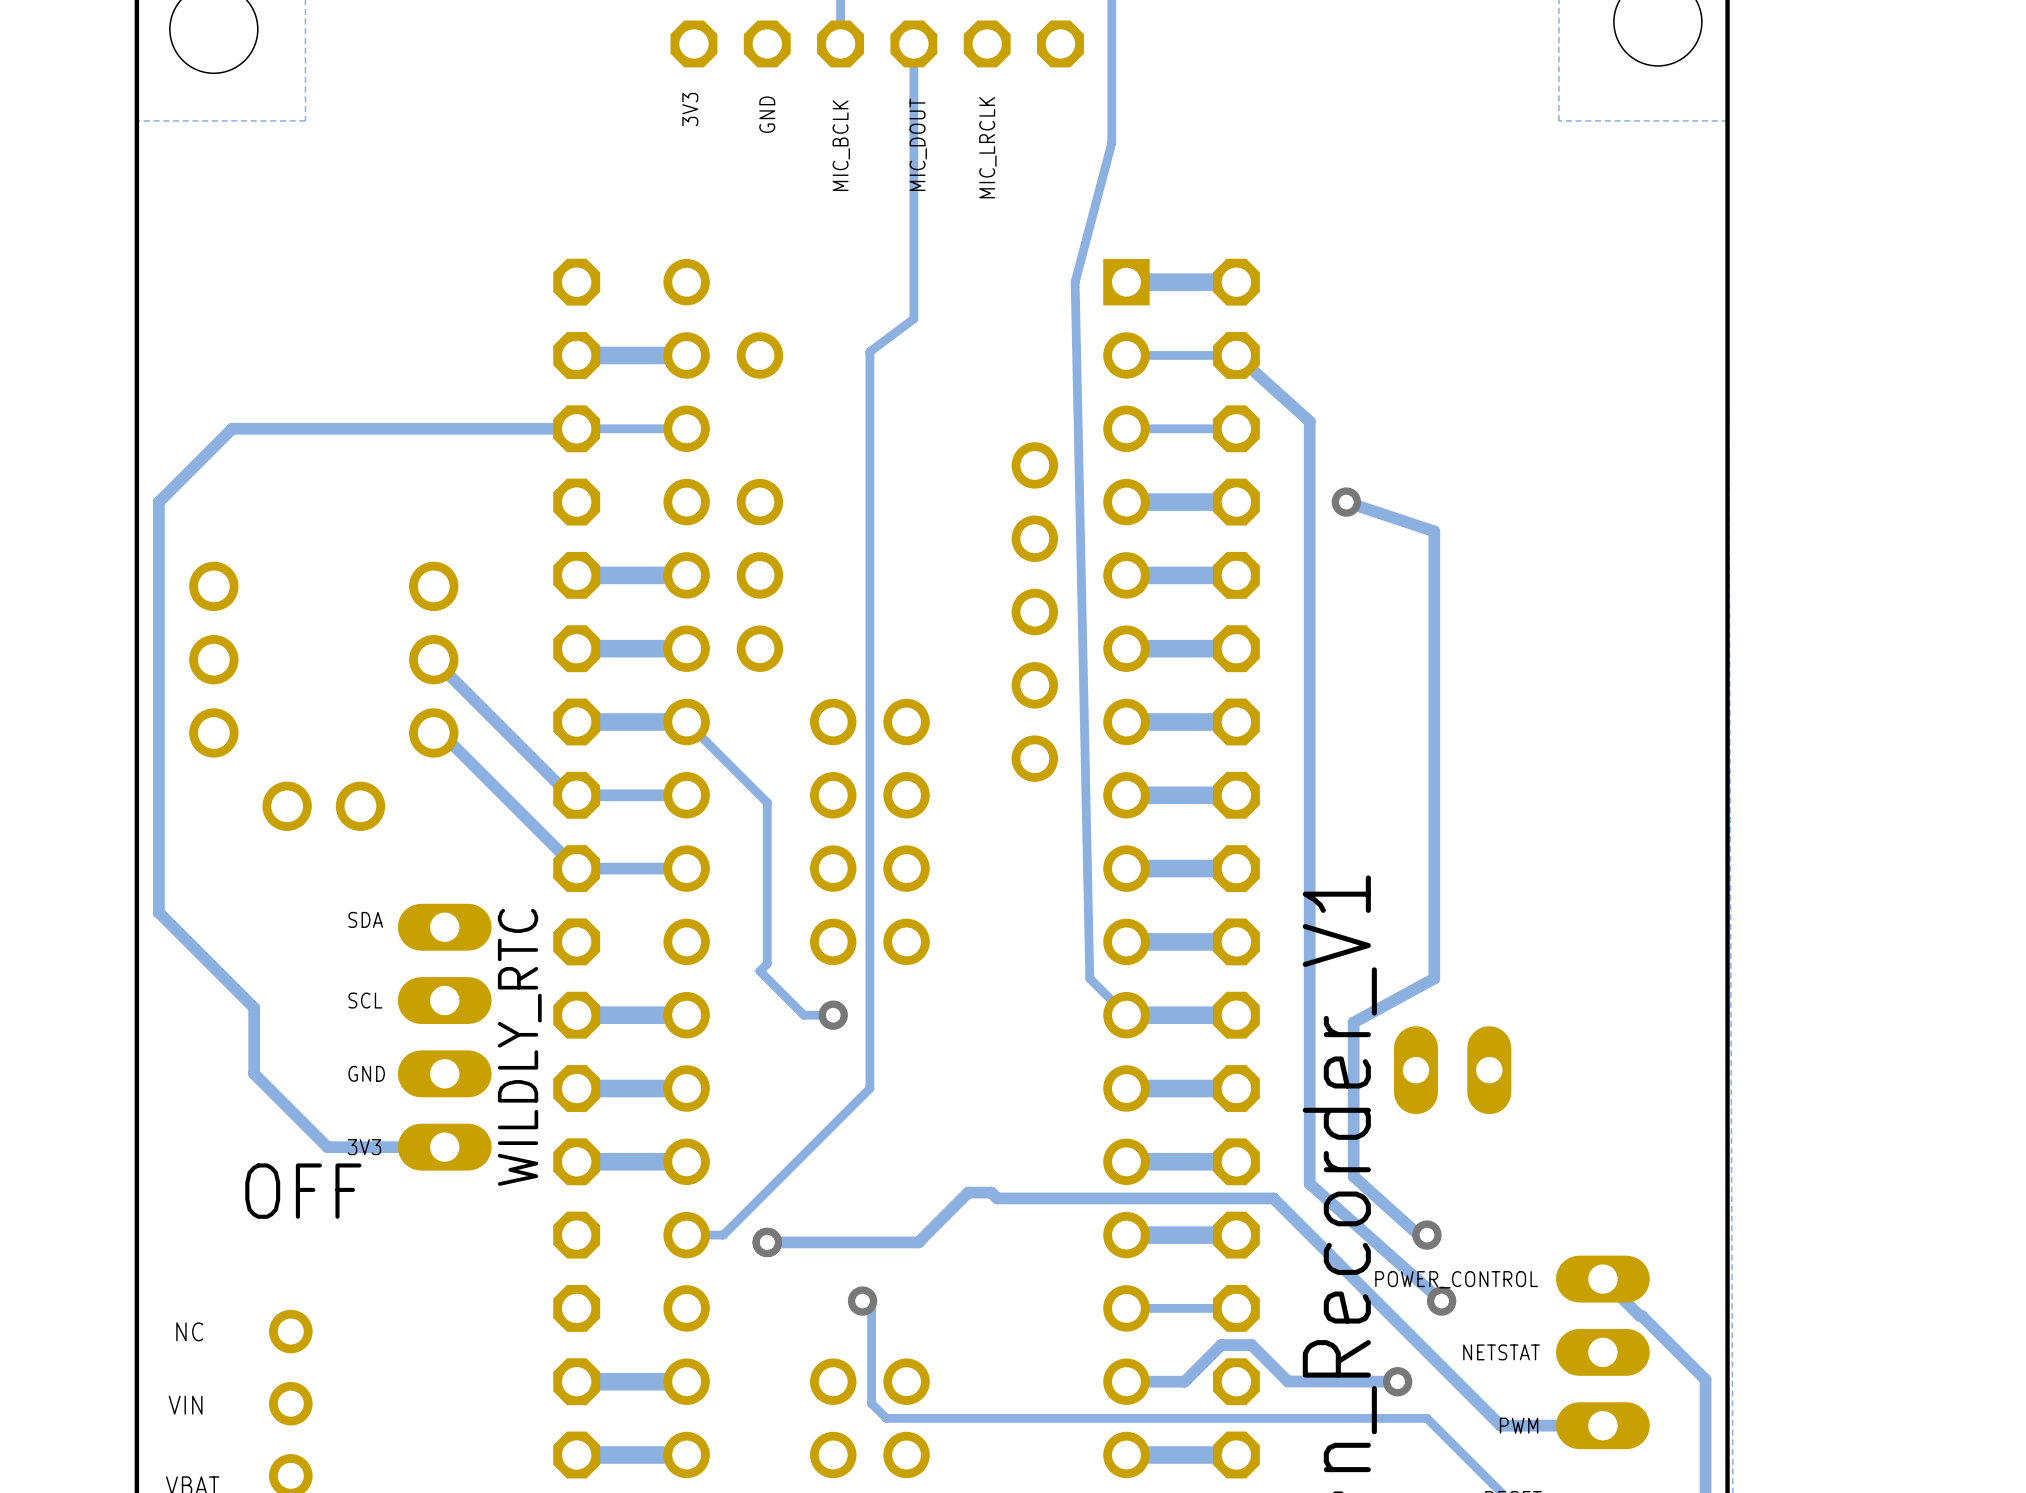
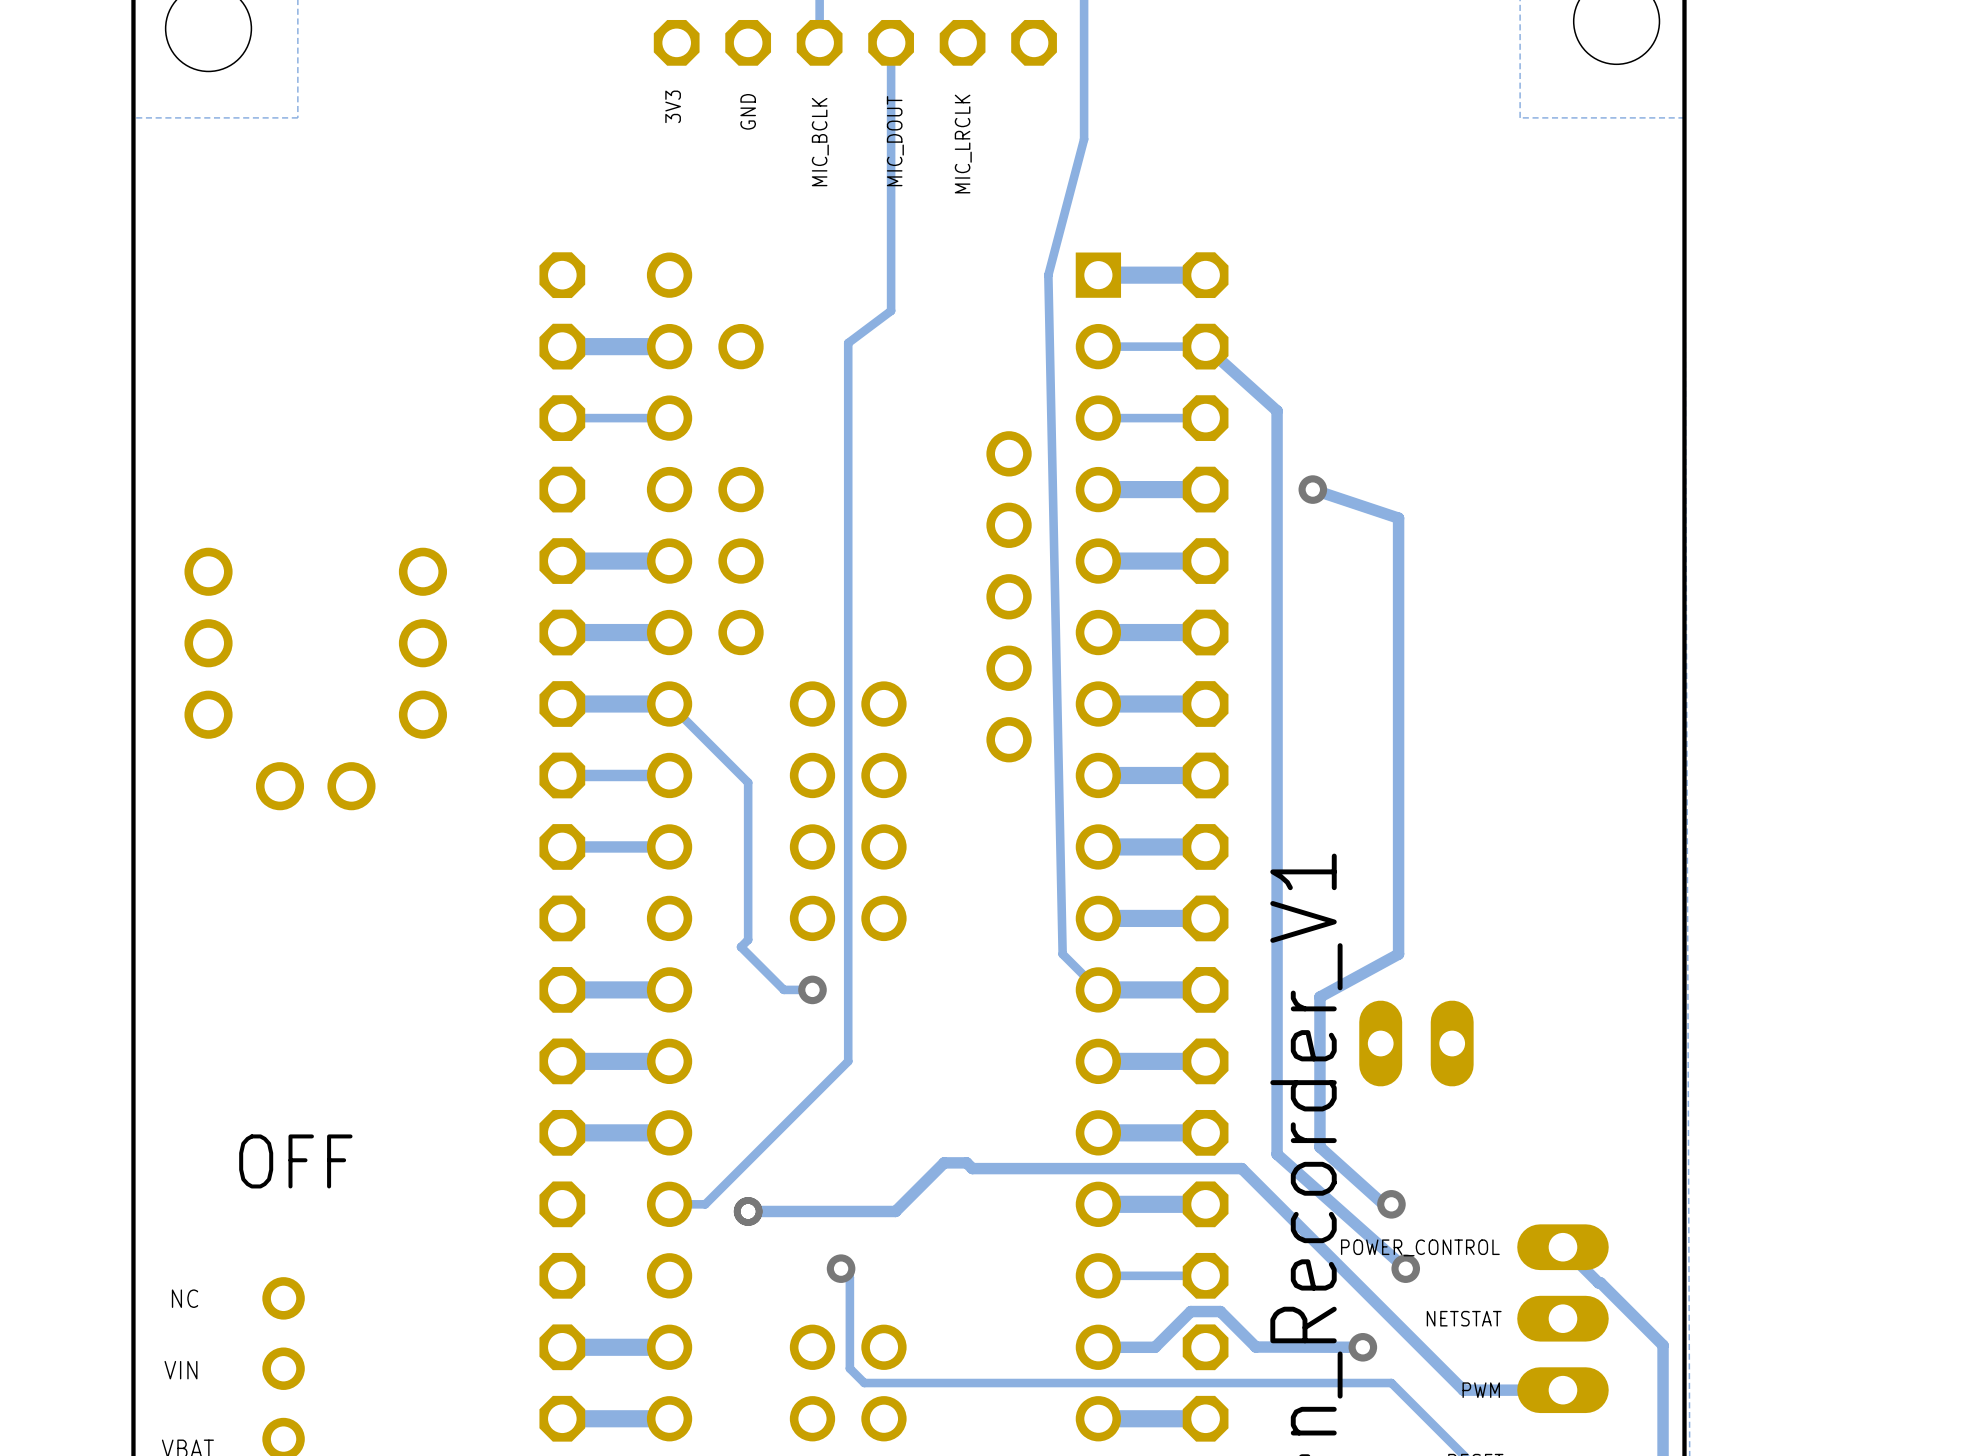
track: (576, 428) (232, 428) (158, 502) (158, 912) (254, 1007) (254, 1073) (327, 1147) (444, 1147) -> none
track: (433, 659) (569, 795) (576, 795) -> none
track: (433, 732) (441, 732) (576, 868) -> none
text: SDA (365, 919) -> none
text: SCL (365, 1000) -> none
WILDLY_RTC: (444, 1037) -> none
text: GND (366, 1073) -> none
text: 3V3 (364, 1147) -> none

